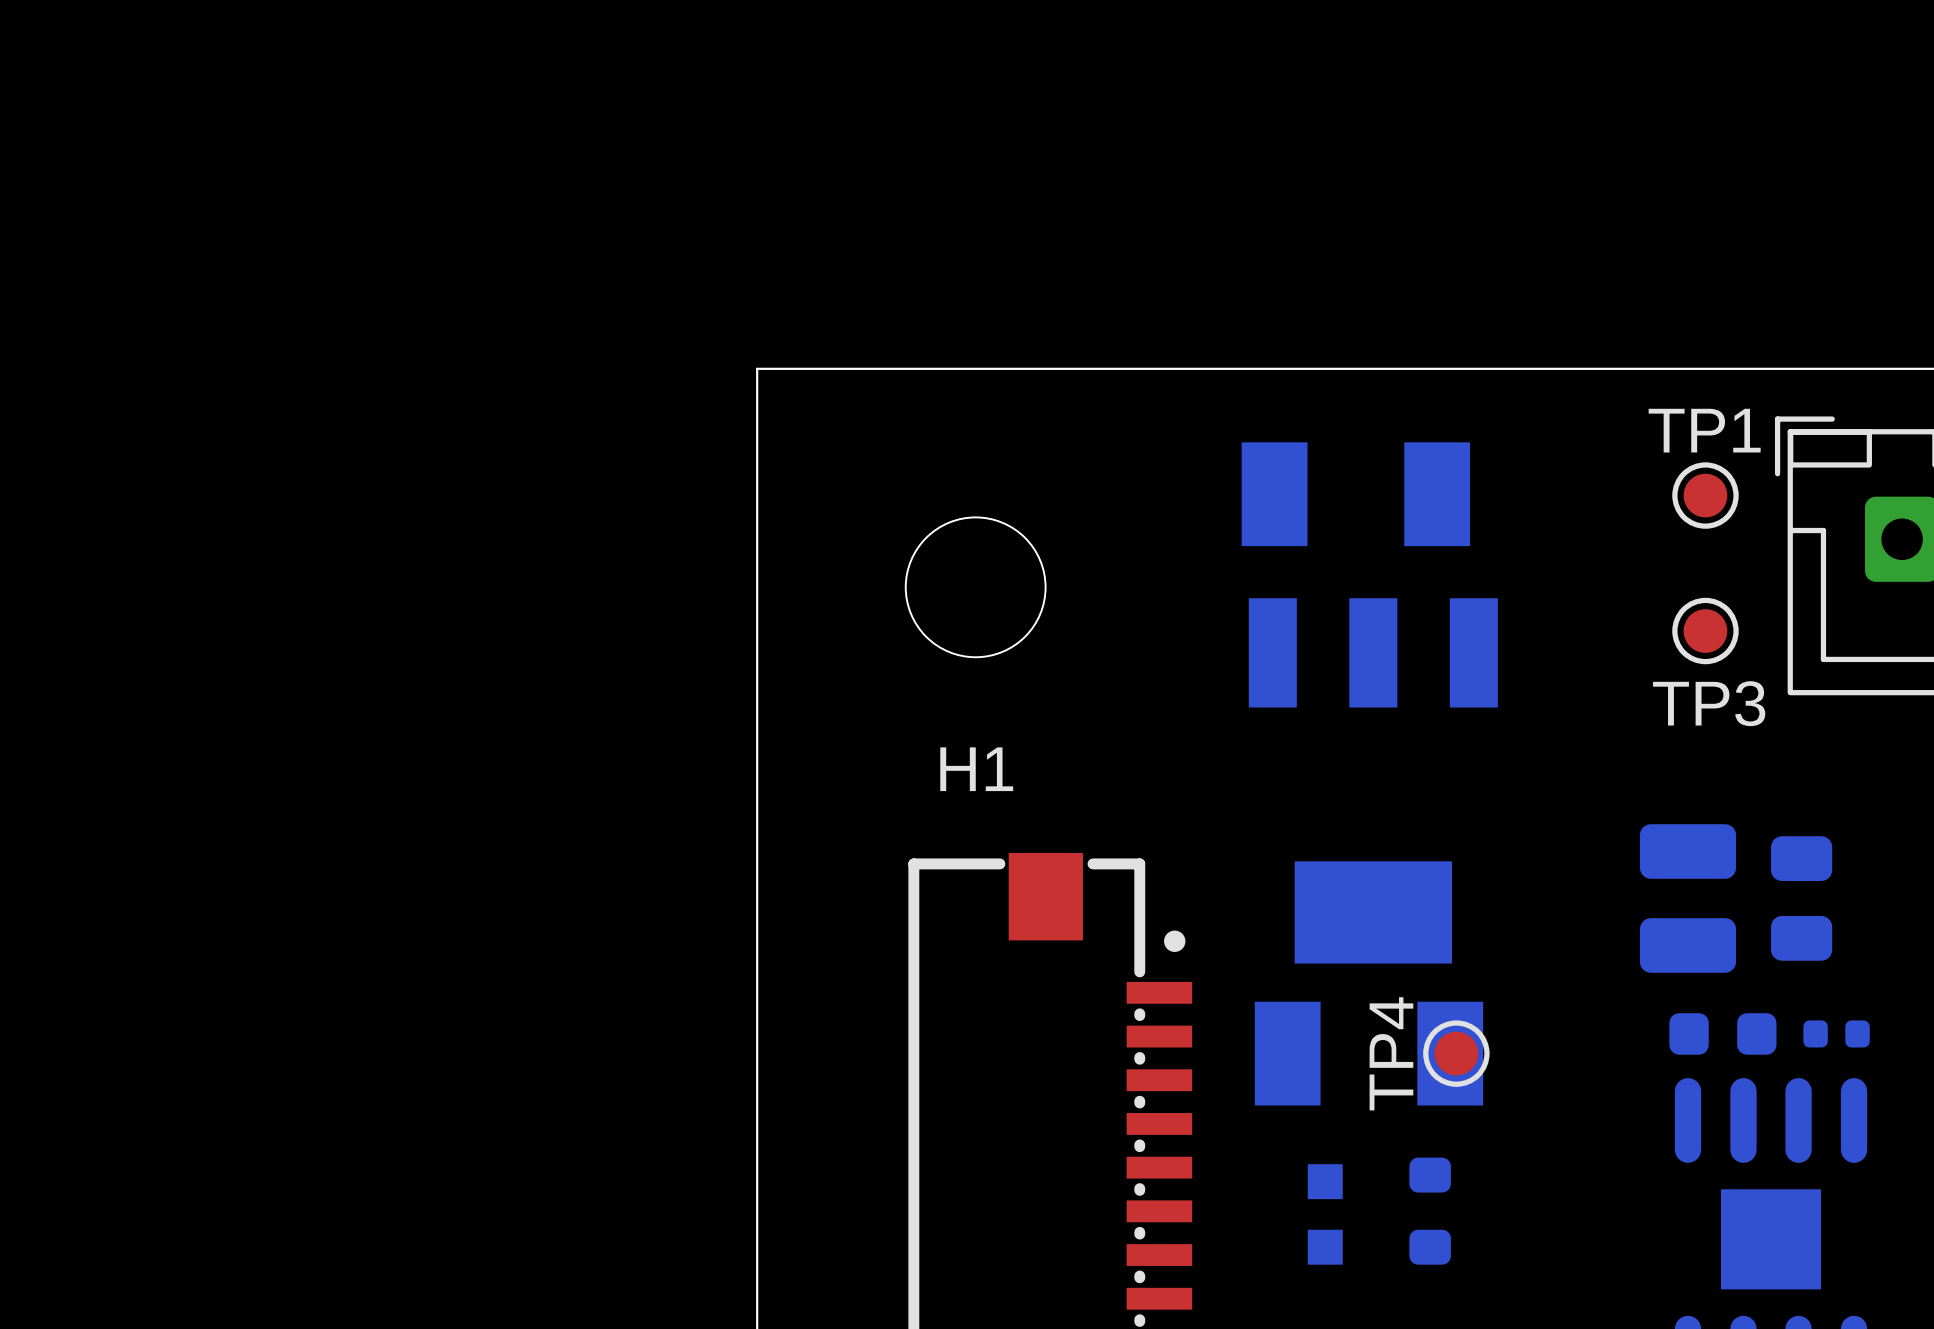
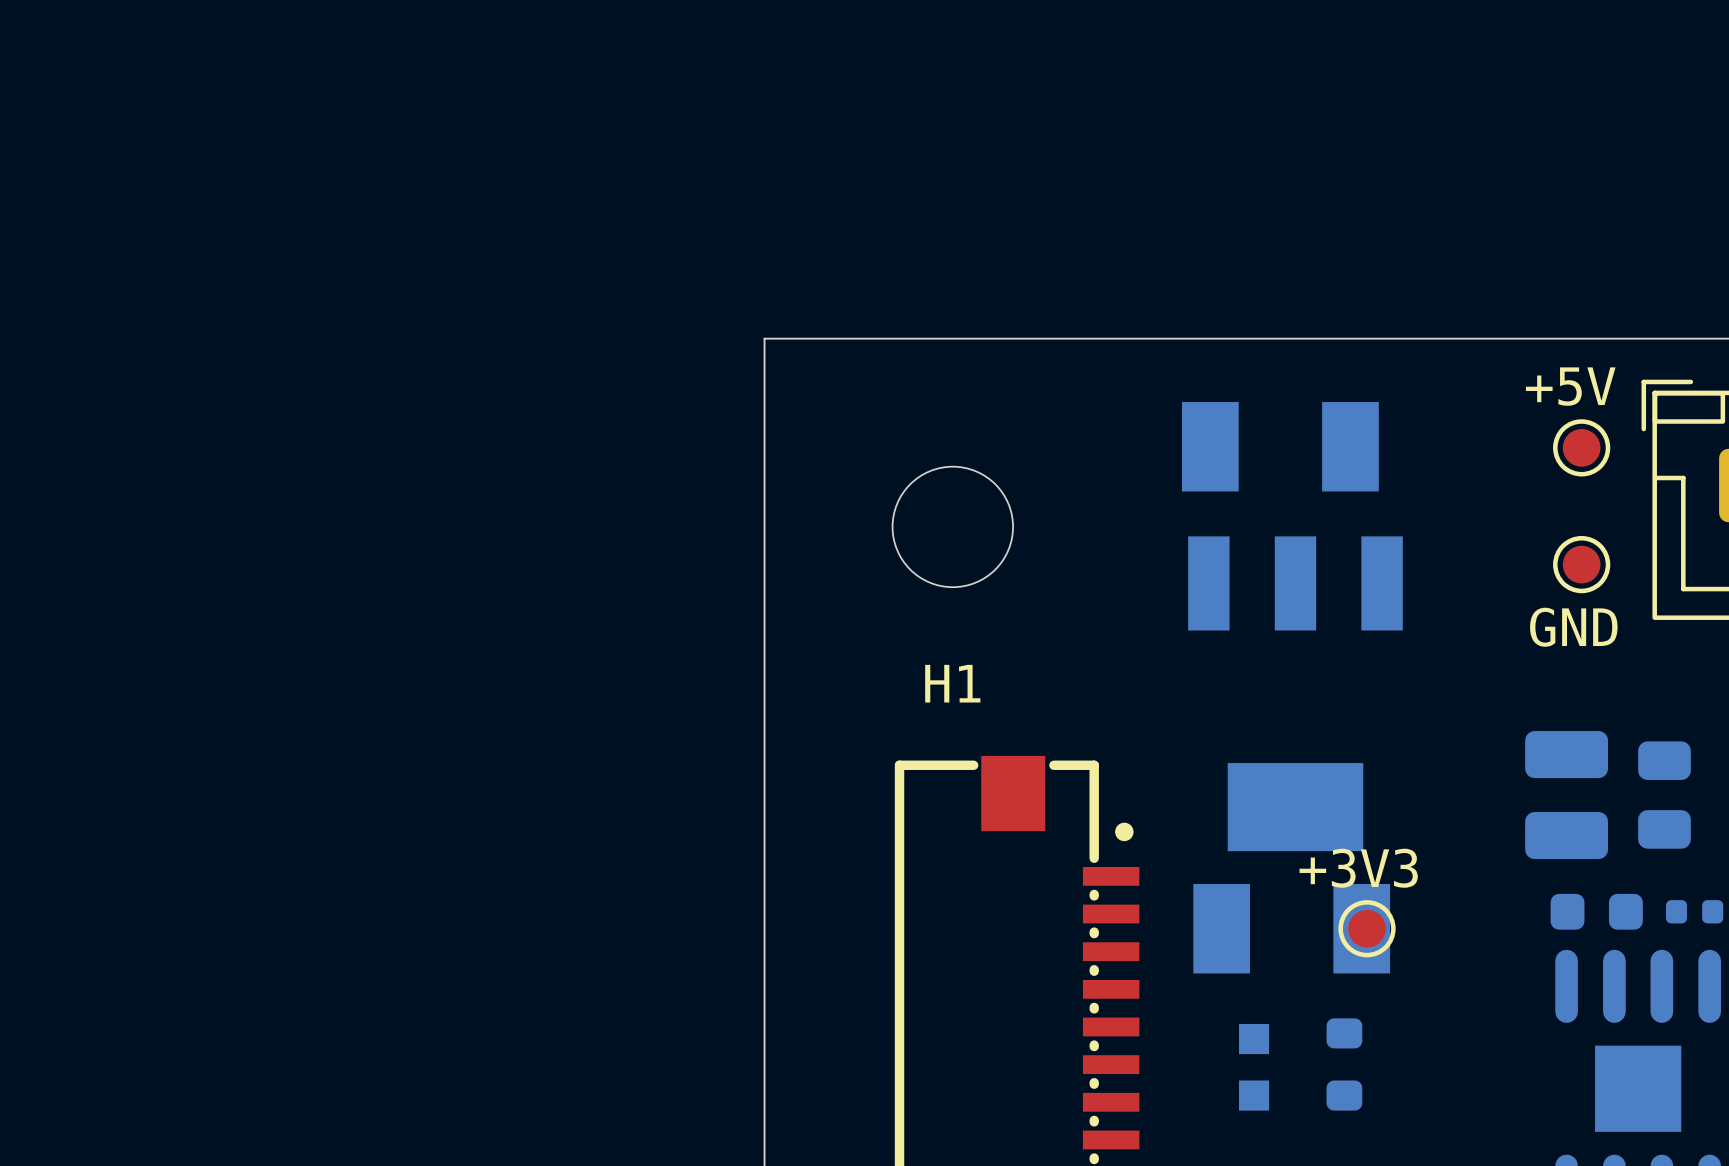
TP1 name: TP1 (1704, 430) -> +5V (1570, 386)
TP3 name: TP3 (1709, 703) -> GND (1573, 627)
TP4 name: TP4 (1391, 1053) -> +3V3 (1358, 868)

